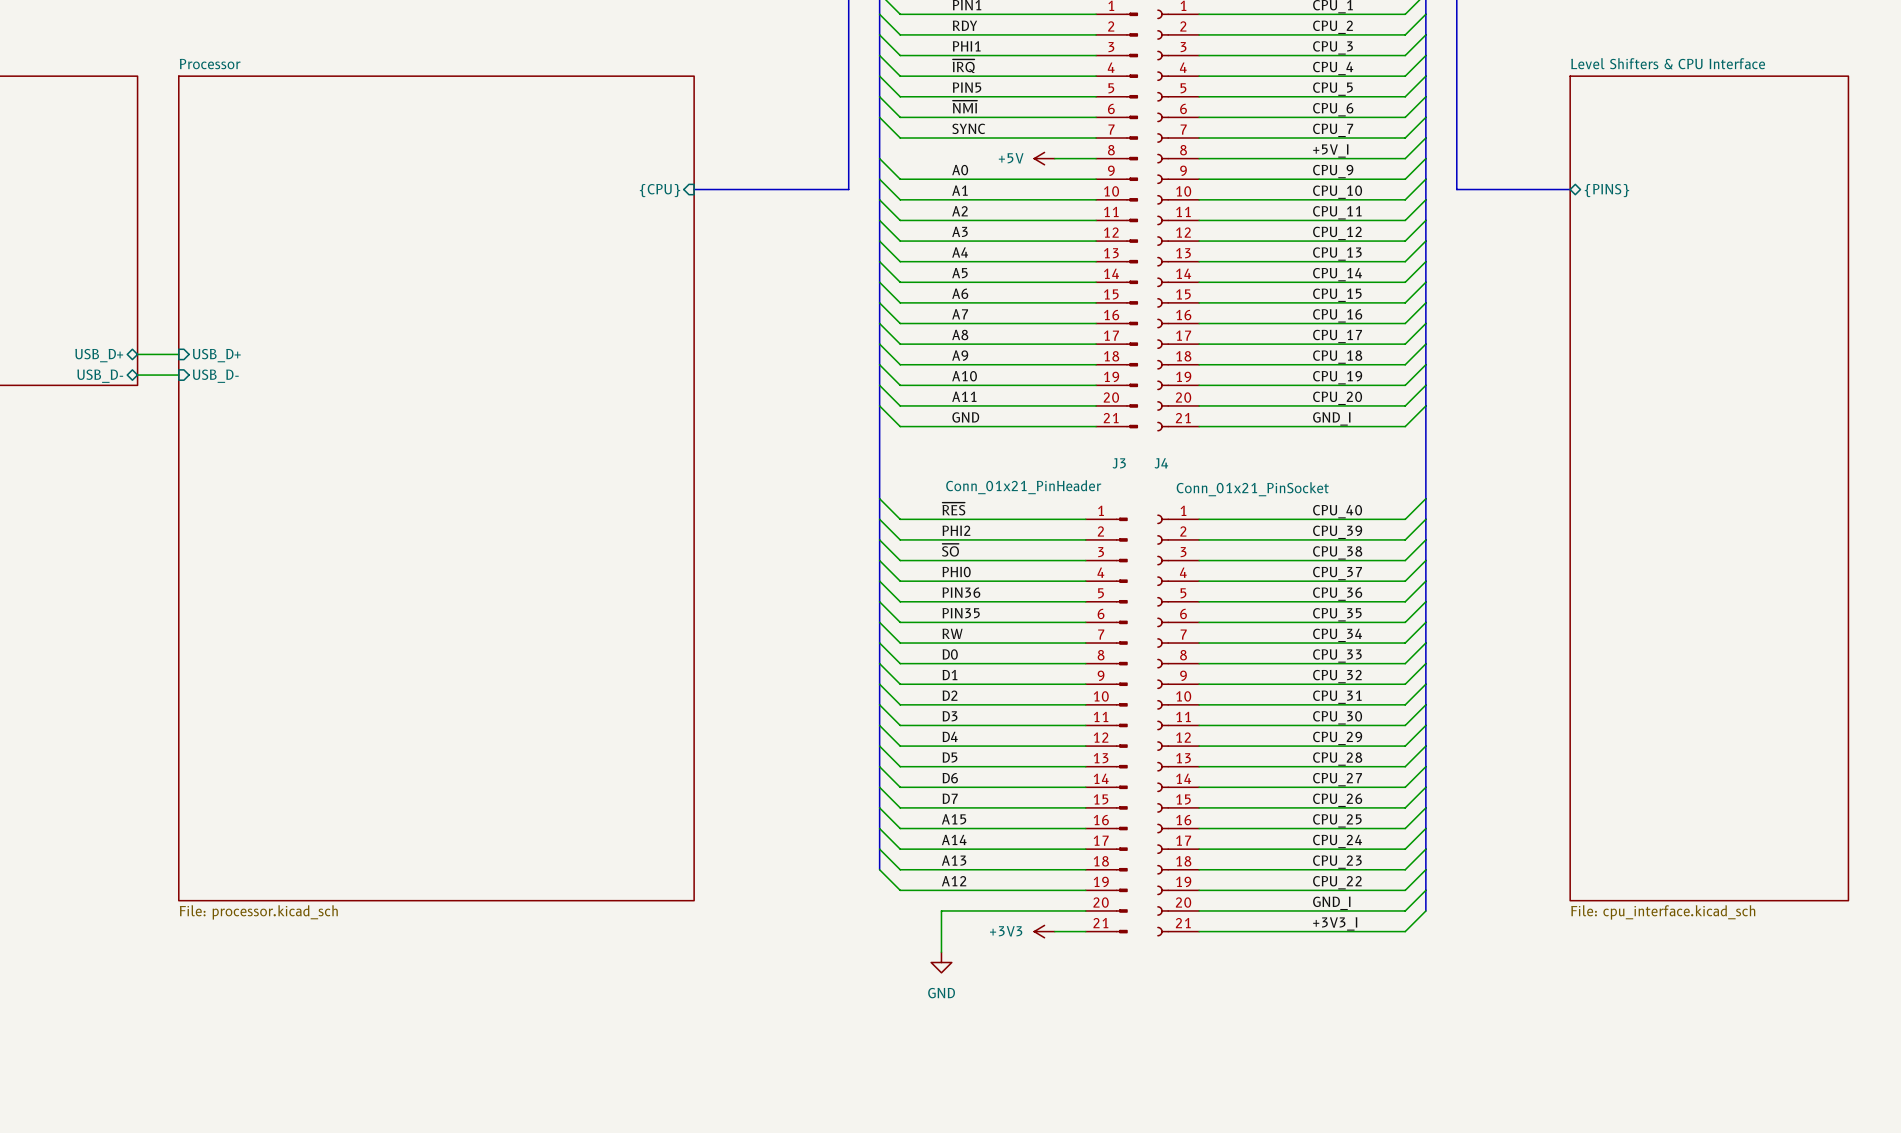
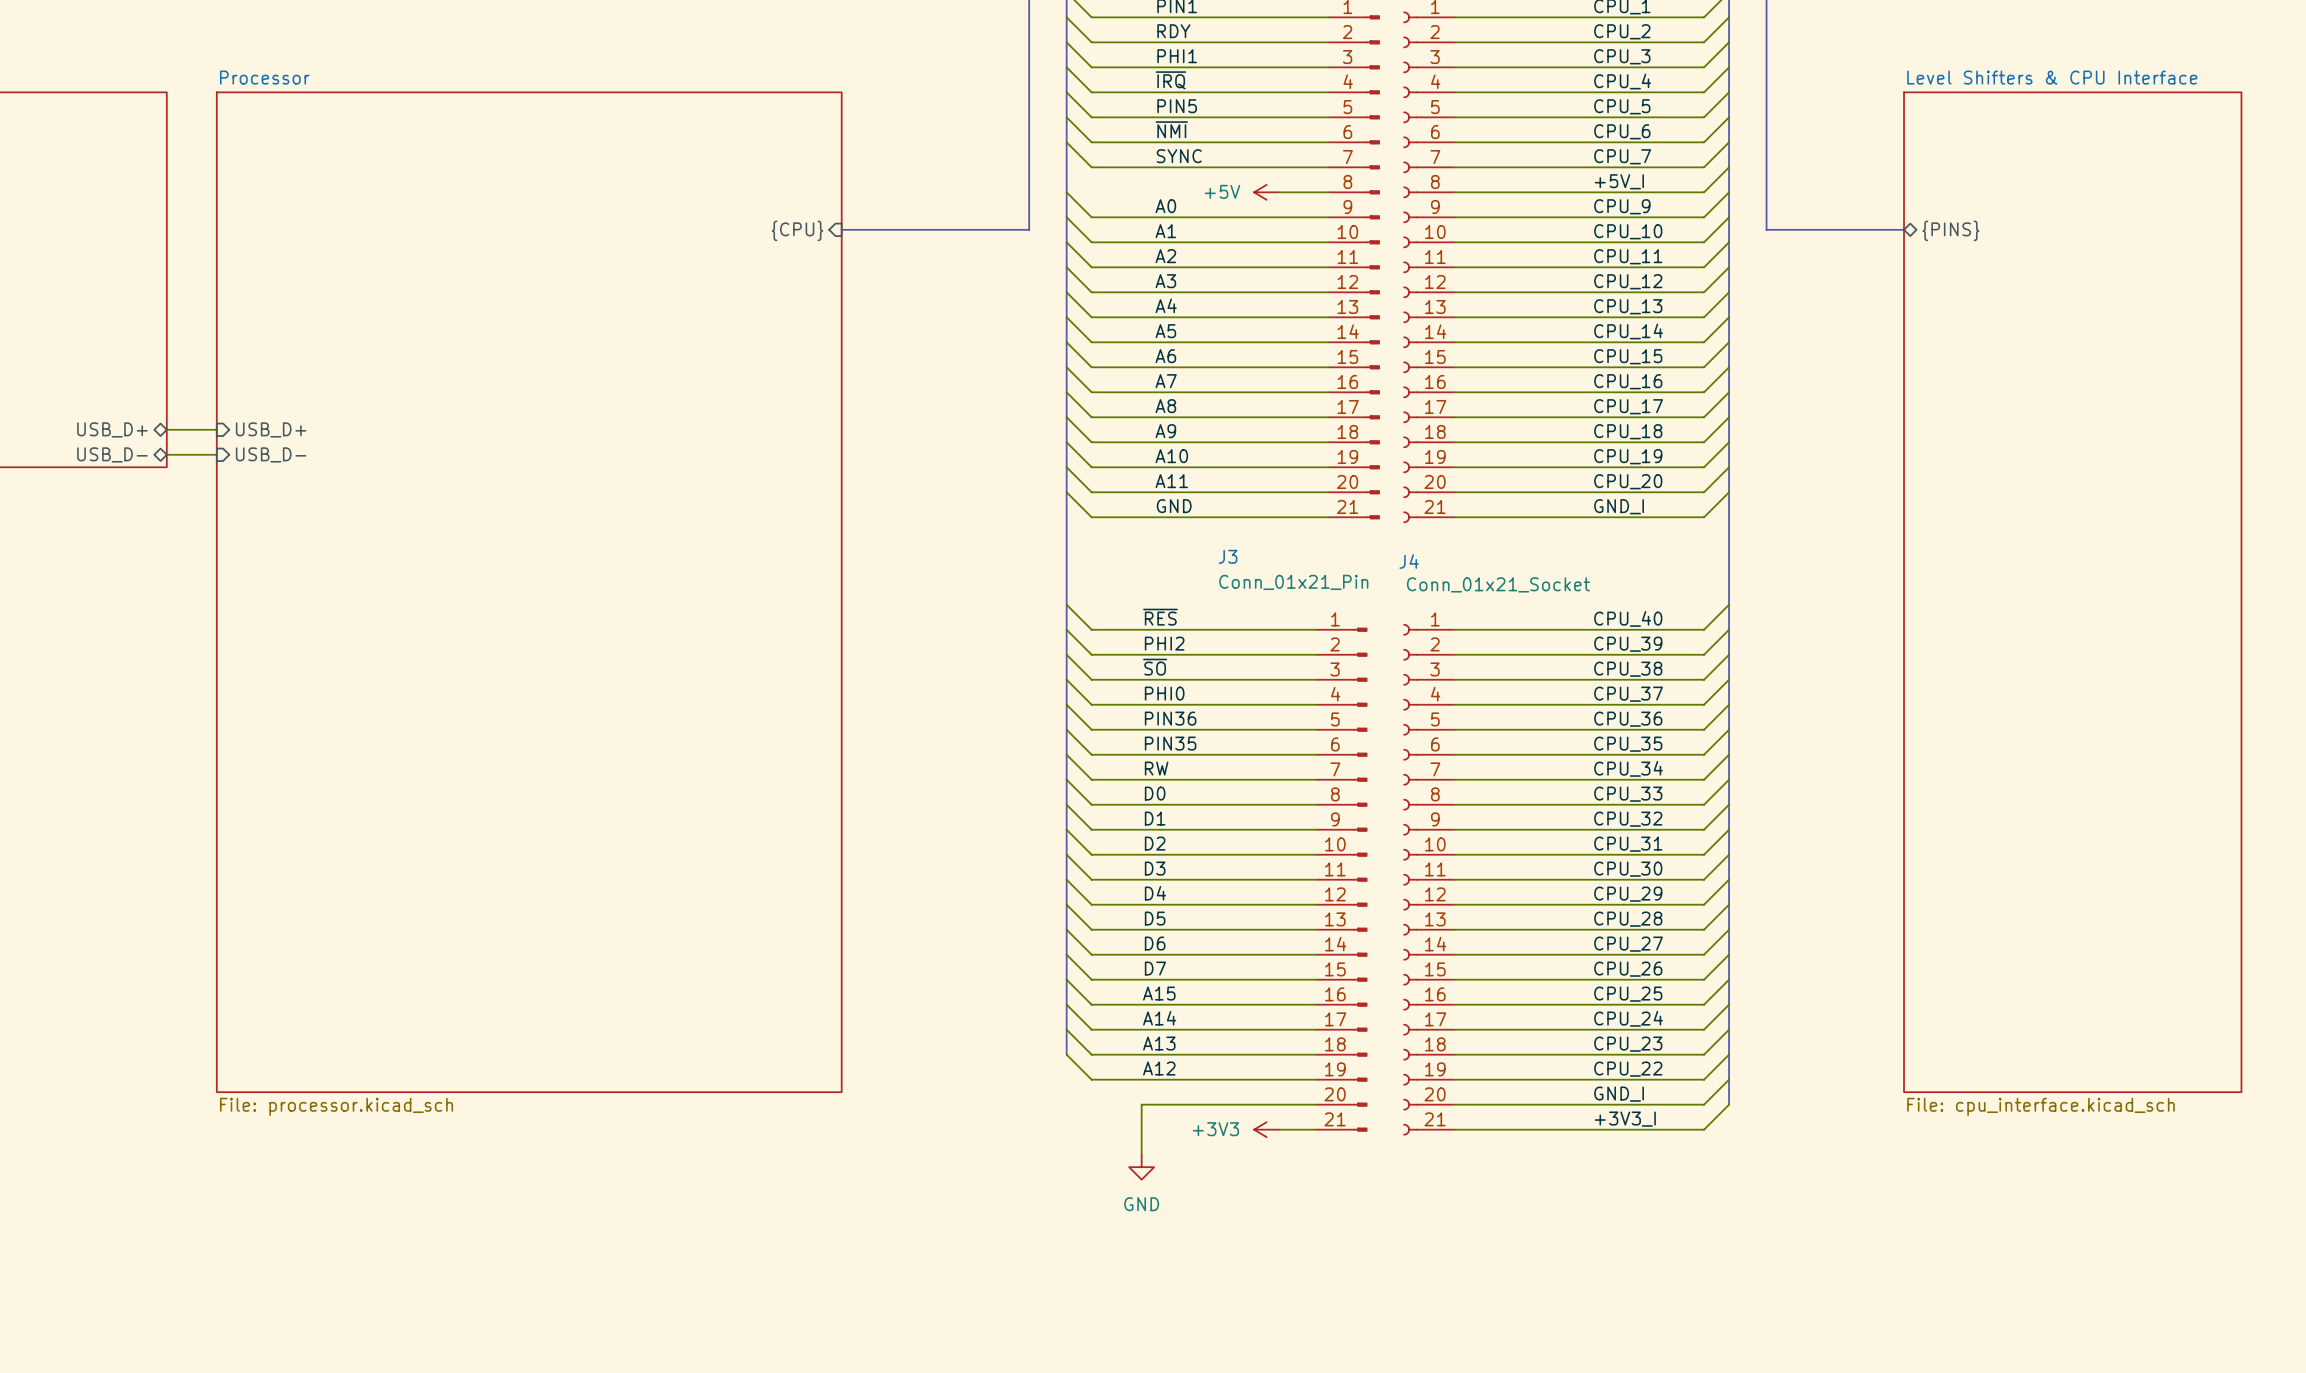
J3 name position: J3 (1119, 463) -> J3 (1228, 556)
J3 value: Conn_01x21_PinHeader (1023, 487) -> Conn_01x21_Pin (1293, 582)
J4 value: Conn_01x21_PinSocket (1252, 489) -> Conn_01x21_Socket (1498, 584)

